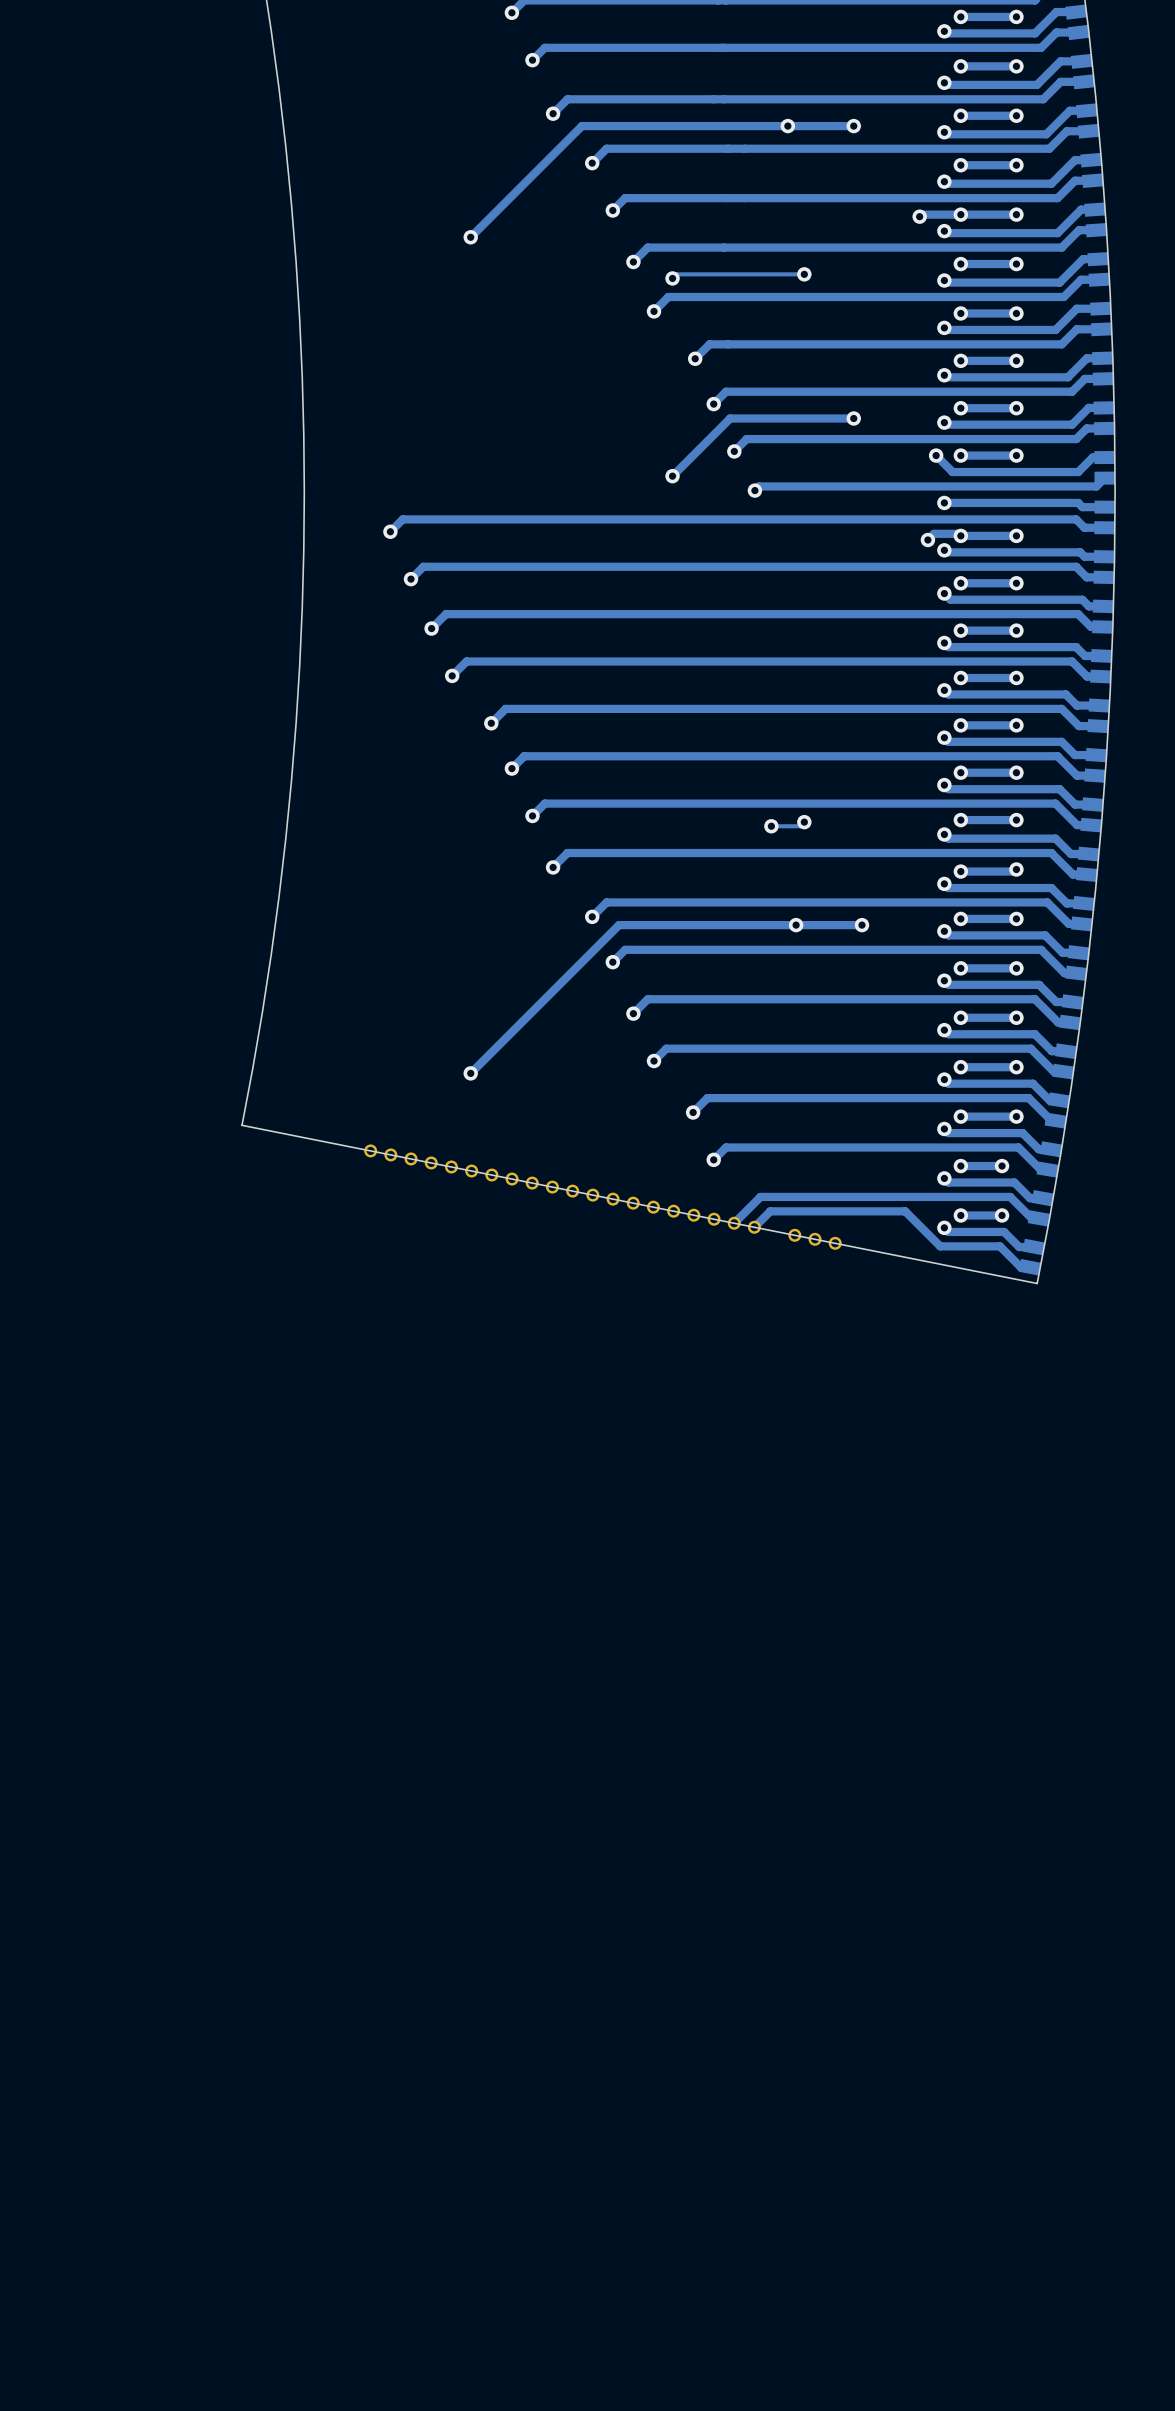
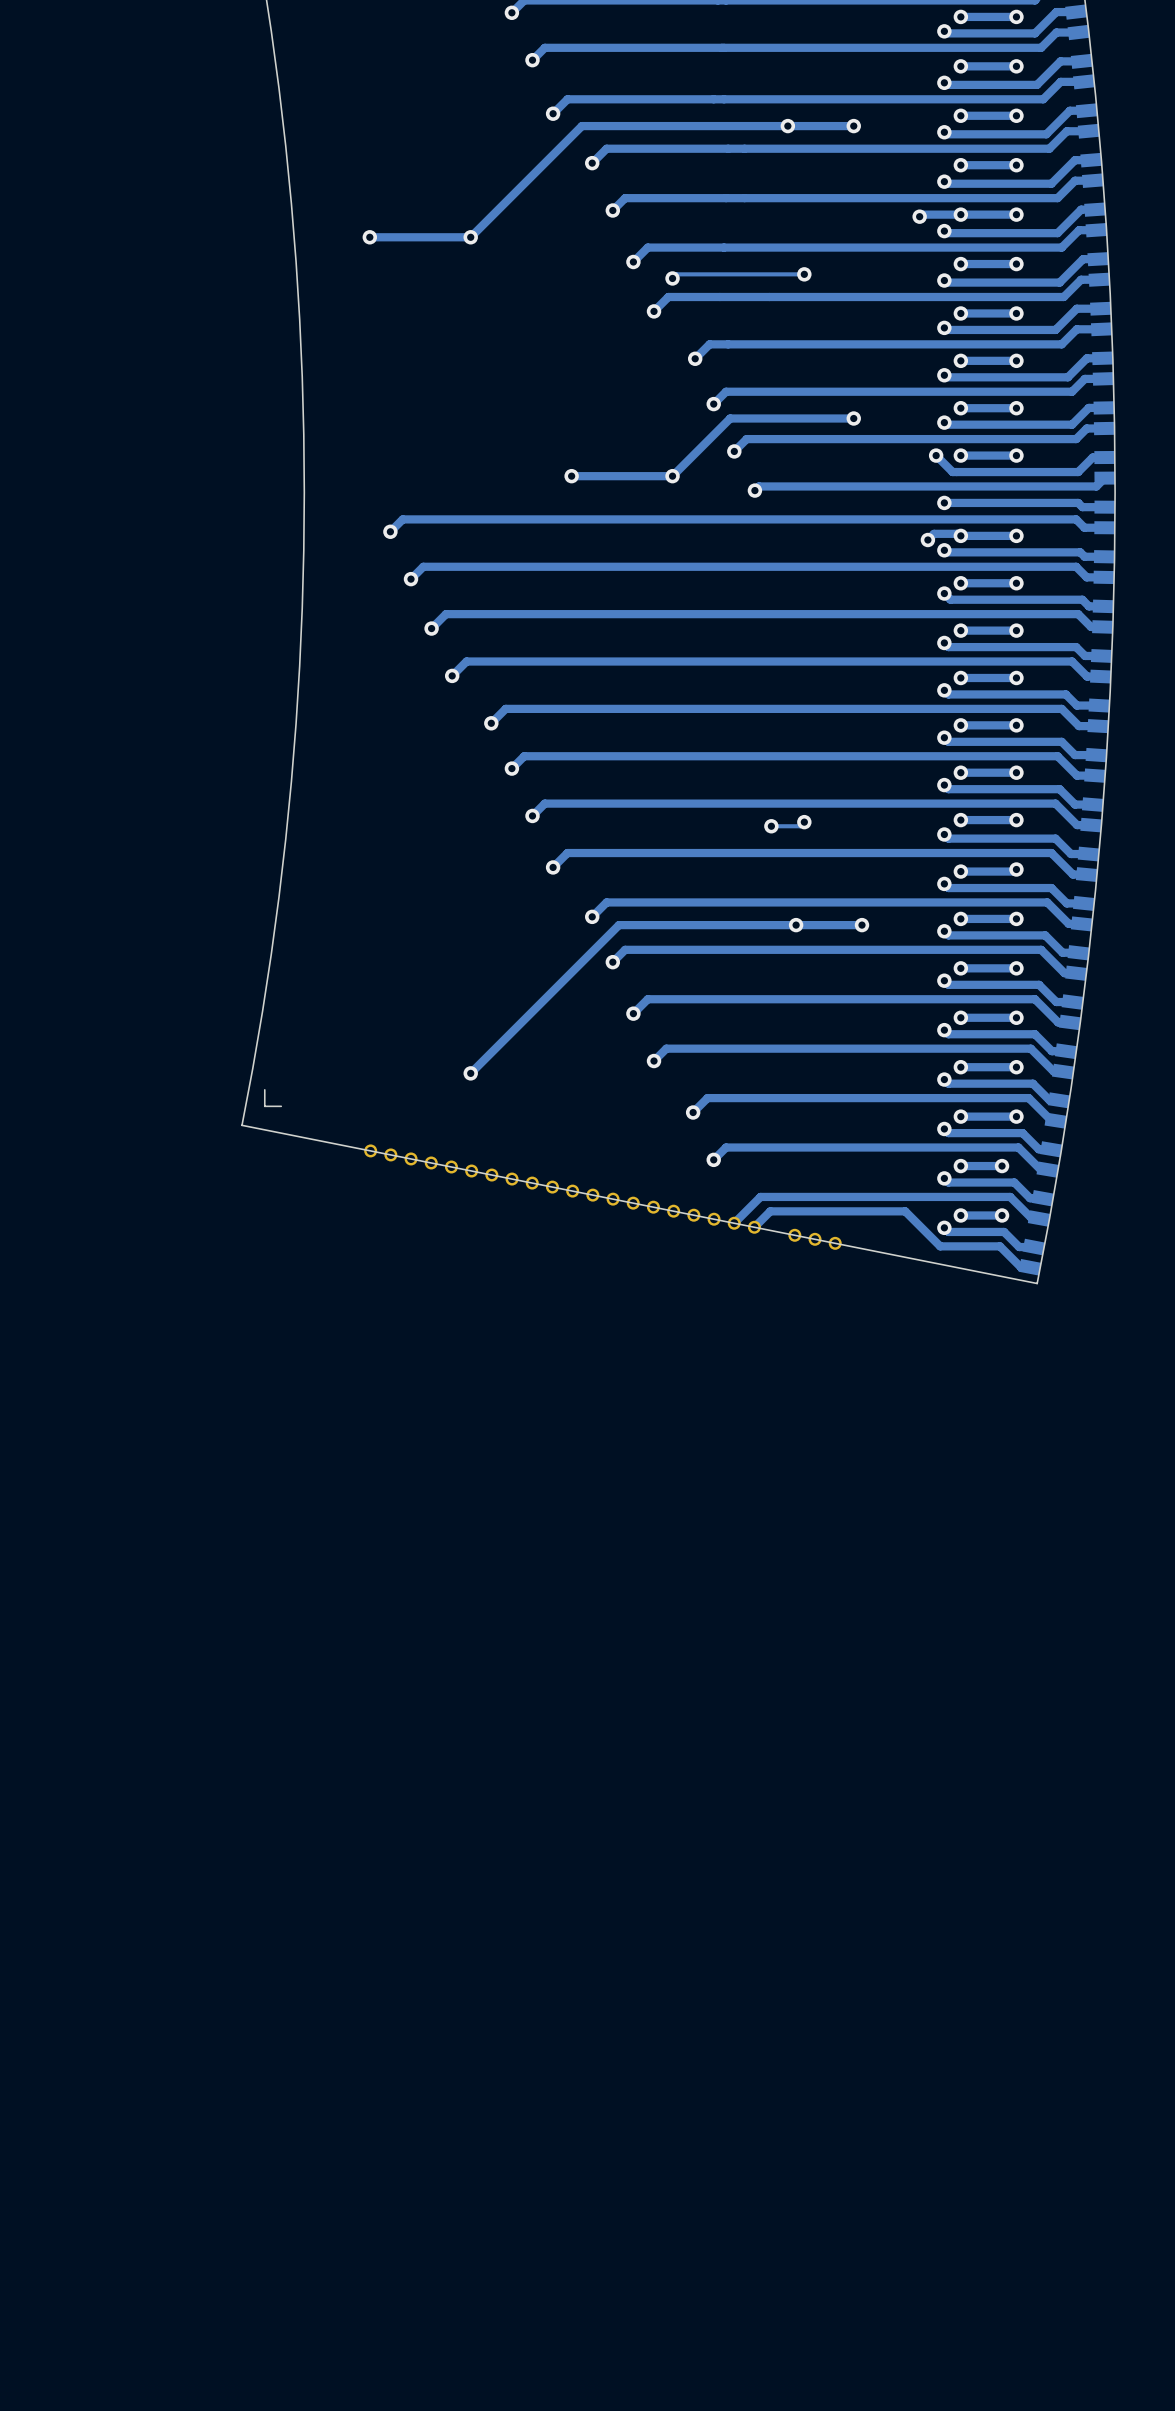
via: none -> (369, 237)
track: none -> (470, 237) (369, 237)
via: none -> (571, 476)
track: none -> (672, 476) (571, 476)
board edge: none -> (264, 1089) (264, 1106) (281, 1106)

